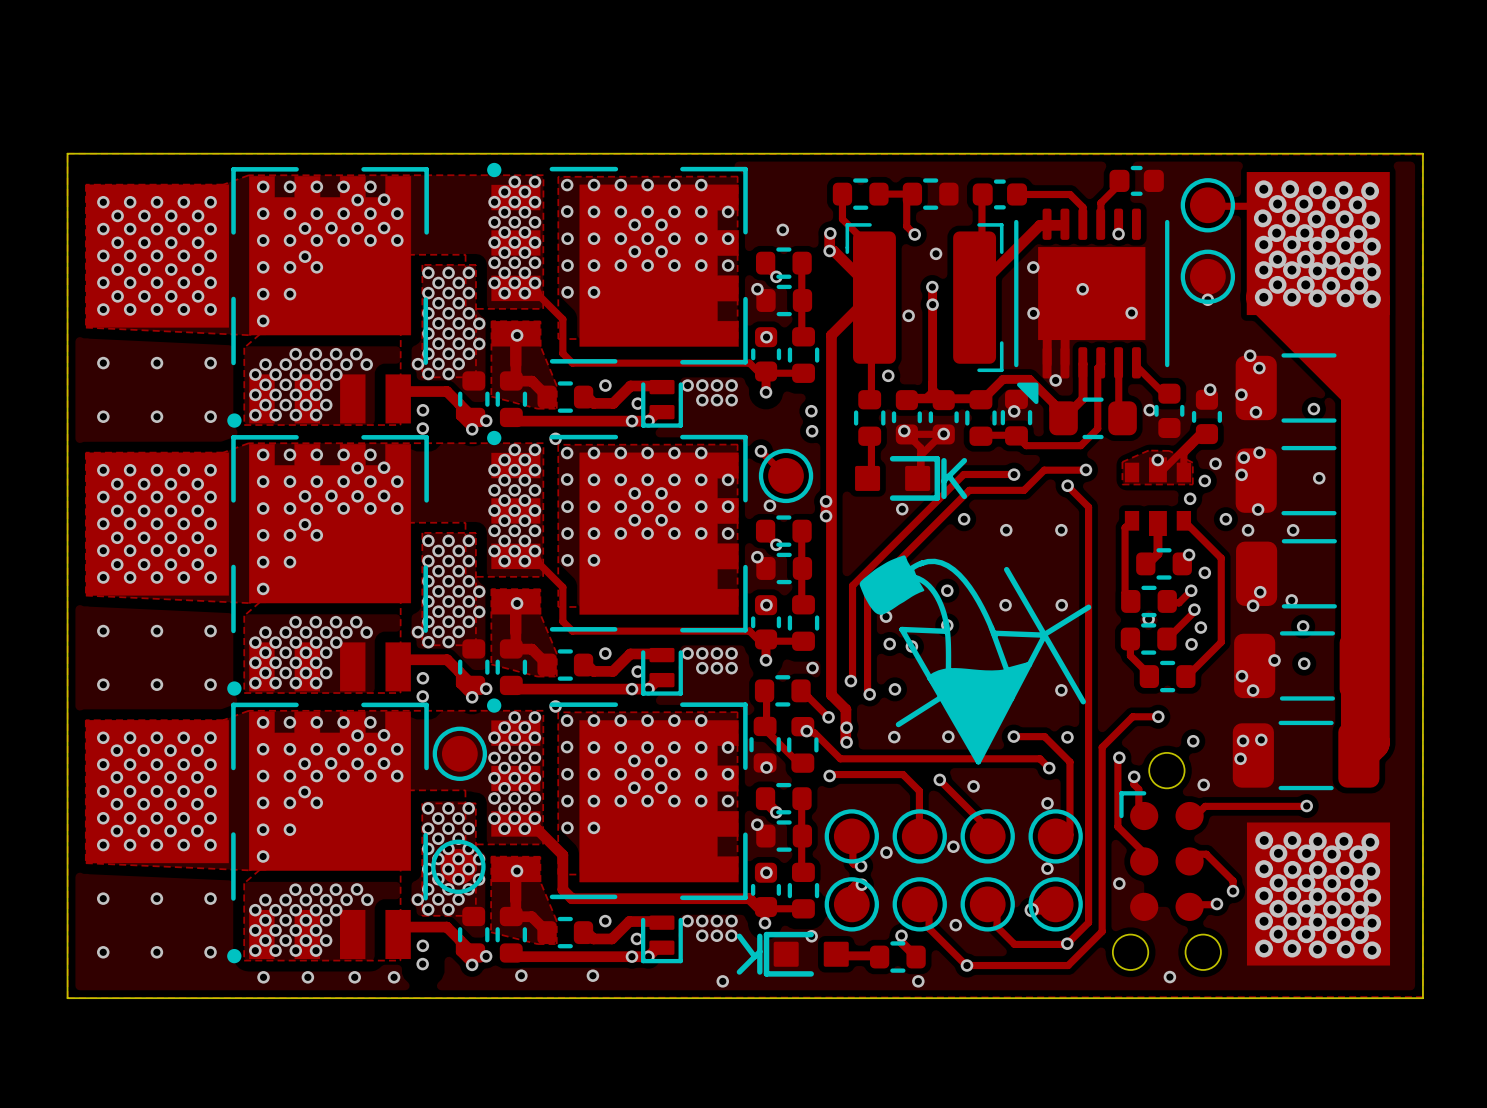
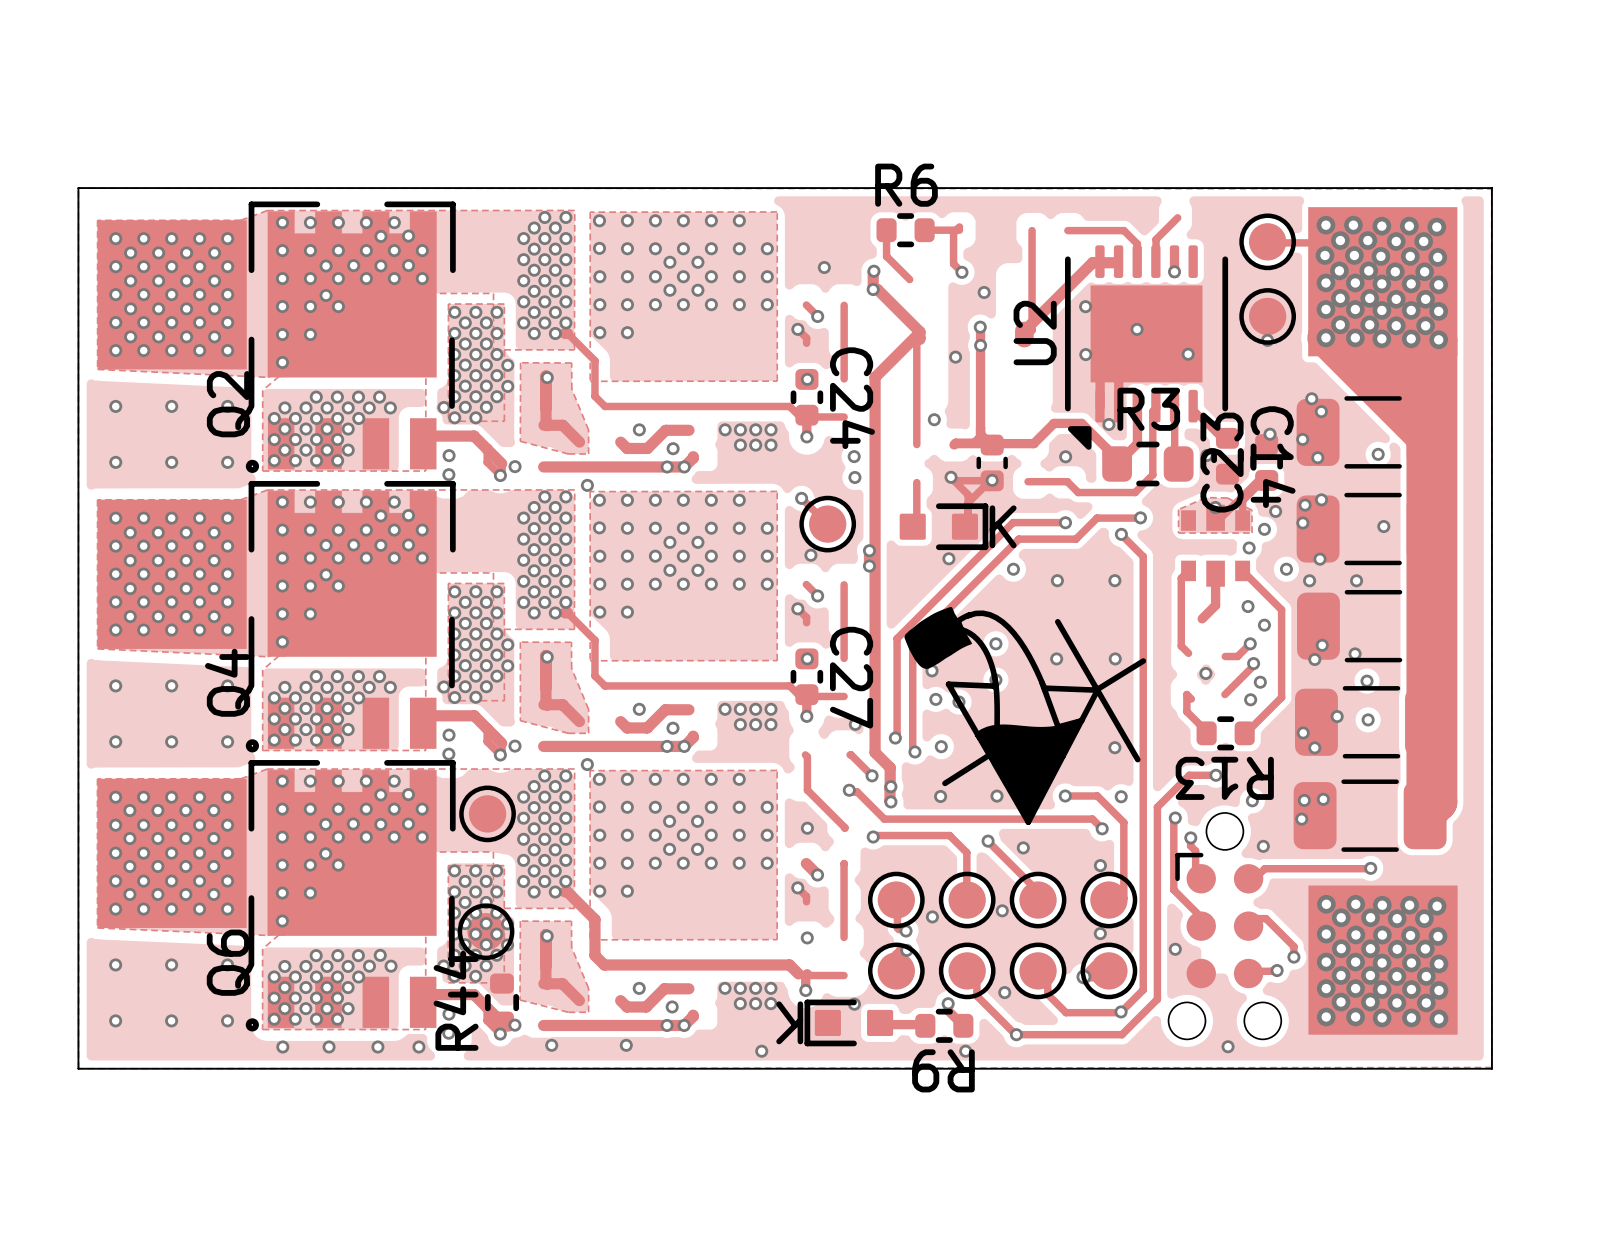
part: (1136, 180) -> none
part: (860, 194) -> none
R6: none -> (905, 230)
part: (930, 194) -> none
part: (999, 194) -> none
part: (617, 263) -> none
part: (783, 263) -> none
Q2: none -> (350, 337)
part: (328, 297) -> none
part: (924, 297) -> none
part: (784, 300) -> none
part: (1091, 306) -> none
U2: none -> (1146, 347)
part: (766, 354) -> none
C24: none -> (806, 397)
part: (803, 355) -> none
part: (565, 397) -> none
part: (473, 399) -> none
part: (511, 399) -> none
part: (662, 403) -> none
part: (1169, 410) -> none
C14: none -> (1227, 456)
part: (1206, 416) -> none
C23: none -> (1266, 462)
part: (869, 417) -> none
part: (906, 417) -> none
part: (980, 417) -> none
part: (1016, 417) -> none
part: (1093, 418) -> none
R3: none -> (1147, 464)
part: (617, 531) -> none
part: (783, 531) -> none
part: (1164, 563) -> none
Q4: none -> (350, 616)
part: (328, 565) -> none
part: (784, 568) -> none
part: (1149, 601) -> none
part: (766, 622) -> none
C27: none -> (806, 676)
part: (803, 623) -> none
part: (1148, 639) -> none
part: (565, 665) -> none
part: (473, 667) -> none
part: (511, 667) -> none
part: (661, 671) -> none
part: (1167, 676) -> none
R13: none -> (1225, 733)
part: (782, 690) -> none
part: (765, 744) -> none
part: (802, 744) -> none
part: (783, 798) -> none
part: (617, 799) -> none
part: (327, 832) -> none
Q6: none -> (350, 895)
part: (784, 836) -> none
part: (765, 889) -> none
part: (803, 890) -> none
part: (565, 932) -> none
part: (473, 934) -> none
R44: none -> (502, 1002)
part: (511, 934) -> none
part: (661, 939) -> none
part: (897, 957) -> none
R9: none -> (944, 1025)

